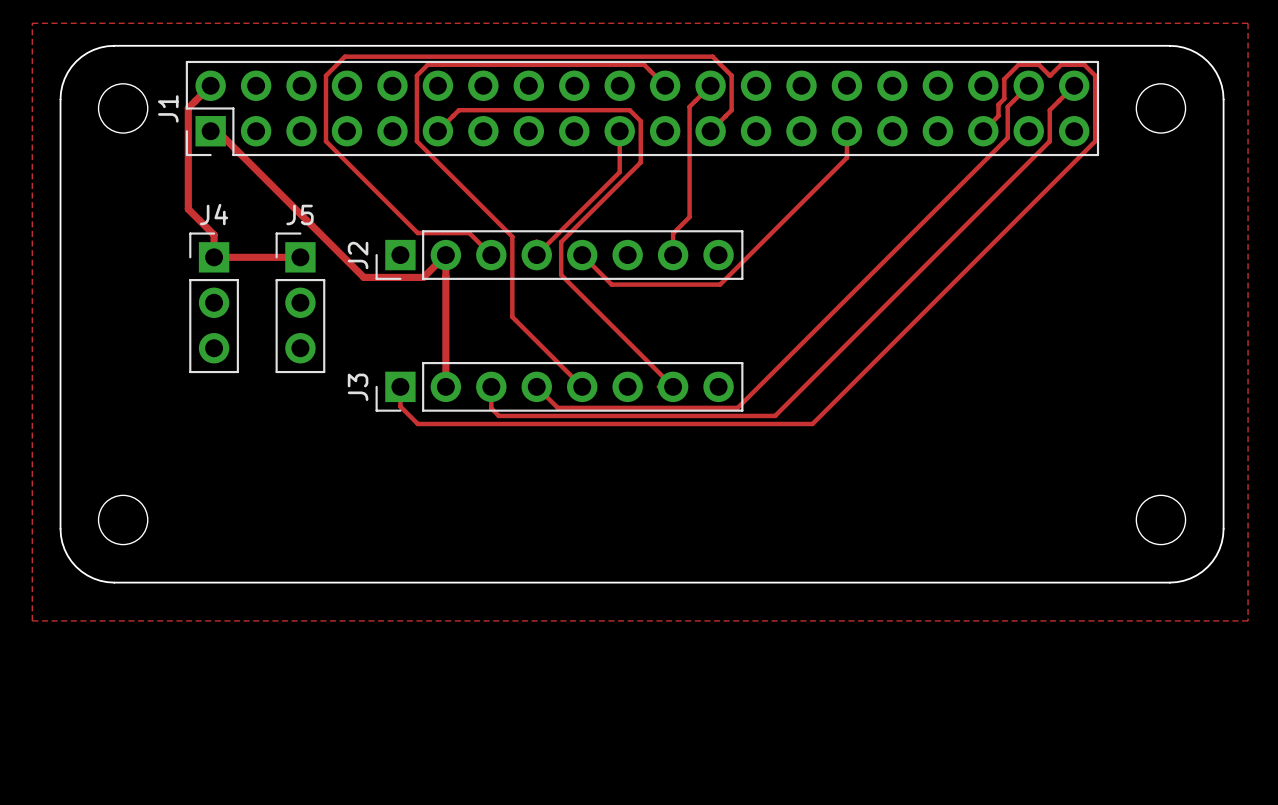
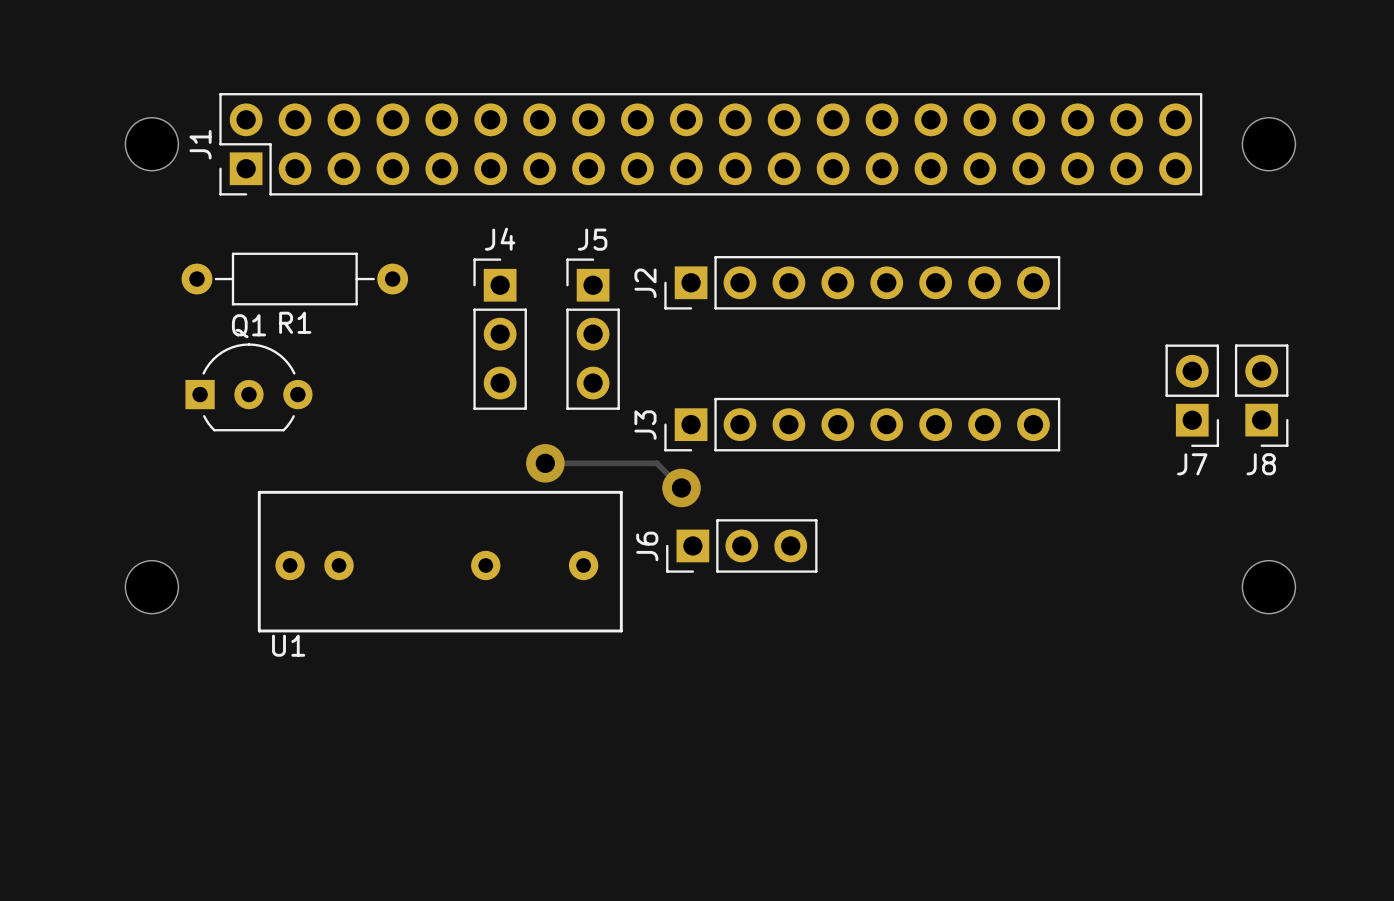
zone outline: (32, 23) (1248, 23) (1248, 620) (32, 620) (32, 23) -> none
board edge: (114, 45) (1169, 45) (1190, 49) (1207, 61) (1216, 72) (1221, 85) (1223, 99) (1223, 528) (1219, 549) (1207, 566) (1196, 575) (1183, 580) (1169, 582) (114, 582) (93, 578) (81, 571) (71, 561) (64, 549) (60, 535) (60, 99) (64, 78) (76, 61) (93, 49) (114, 45) -> none
track: (210, 85) (188, 108) (188, 209) (214, 234) (214, 257) (300, 257) -> none
track: (665, 85) (644, 64) (427, 64) (416, 75) (416, 141) (512, 236) (512, 316) (582, 386) -> none
track: (710, 85) (689, 106) (689, 217) (673, 233) (673, 255) -> none
track: (1028, 85) (1007, 106) (1007, 137) (737, 407) (557, 407) (536, 386) -> none
track: (1074, 85) (1049, 110) (1049, 141) (775, 415) (498, 415) (491, 408) (491, 386) -> none
track: (210, 131) (217, 131) (363, 277) (423, 277) (445, 255) (445, 386) -> none
track: (437, 131) (458, 110) (629, 110) (640, 121) (640, 162) (561, 242) (561, 274) (673, 386) (658, 386) -> none
track: (619, 131) (619, 172) (536, 255) (536, 241) -> none
track: (710, 131) (731, 110) (731, 75) (712, 56) (344, 56) (325, 75) (325, 141) (417, 233) (469, 233) (491, 255) -> none
track: (846, 131) (846, 157) (720, 284) (611, 284) (582, 255) -> none
track: (983, 131) (998, 116) (998, 104) (1004, 98) (1004, 79) (1018, 64) (1038, 64) (1049, 75) (1061, 64) (1084, 64) (1095, 75) (1095, 141) (812, 423) (417, 423) (400, 406) (400, 386) -> none
R1: none -> (294, 279)
J2 position: (559, 255) -> (862, 282)
J4 position: (214, 302) -> (500, 334)
J5 position: (300, 302) -> (593, 334)
Q1: none -> (248, 387)
J7: none -> (1192, 395)
J8: none -> (1261, 395)
J3 position: (559, 386) -> (862, 424)
track: none -> (545, 463) (656, 463) (681, 487)
via: none -> (545, 463)
via: none -> (681, 487)
J6: none -> (741, 545)
U1: none -> (440, 561)

